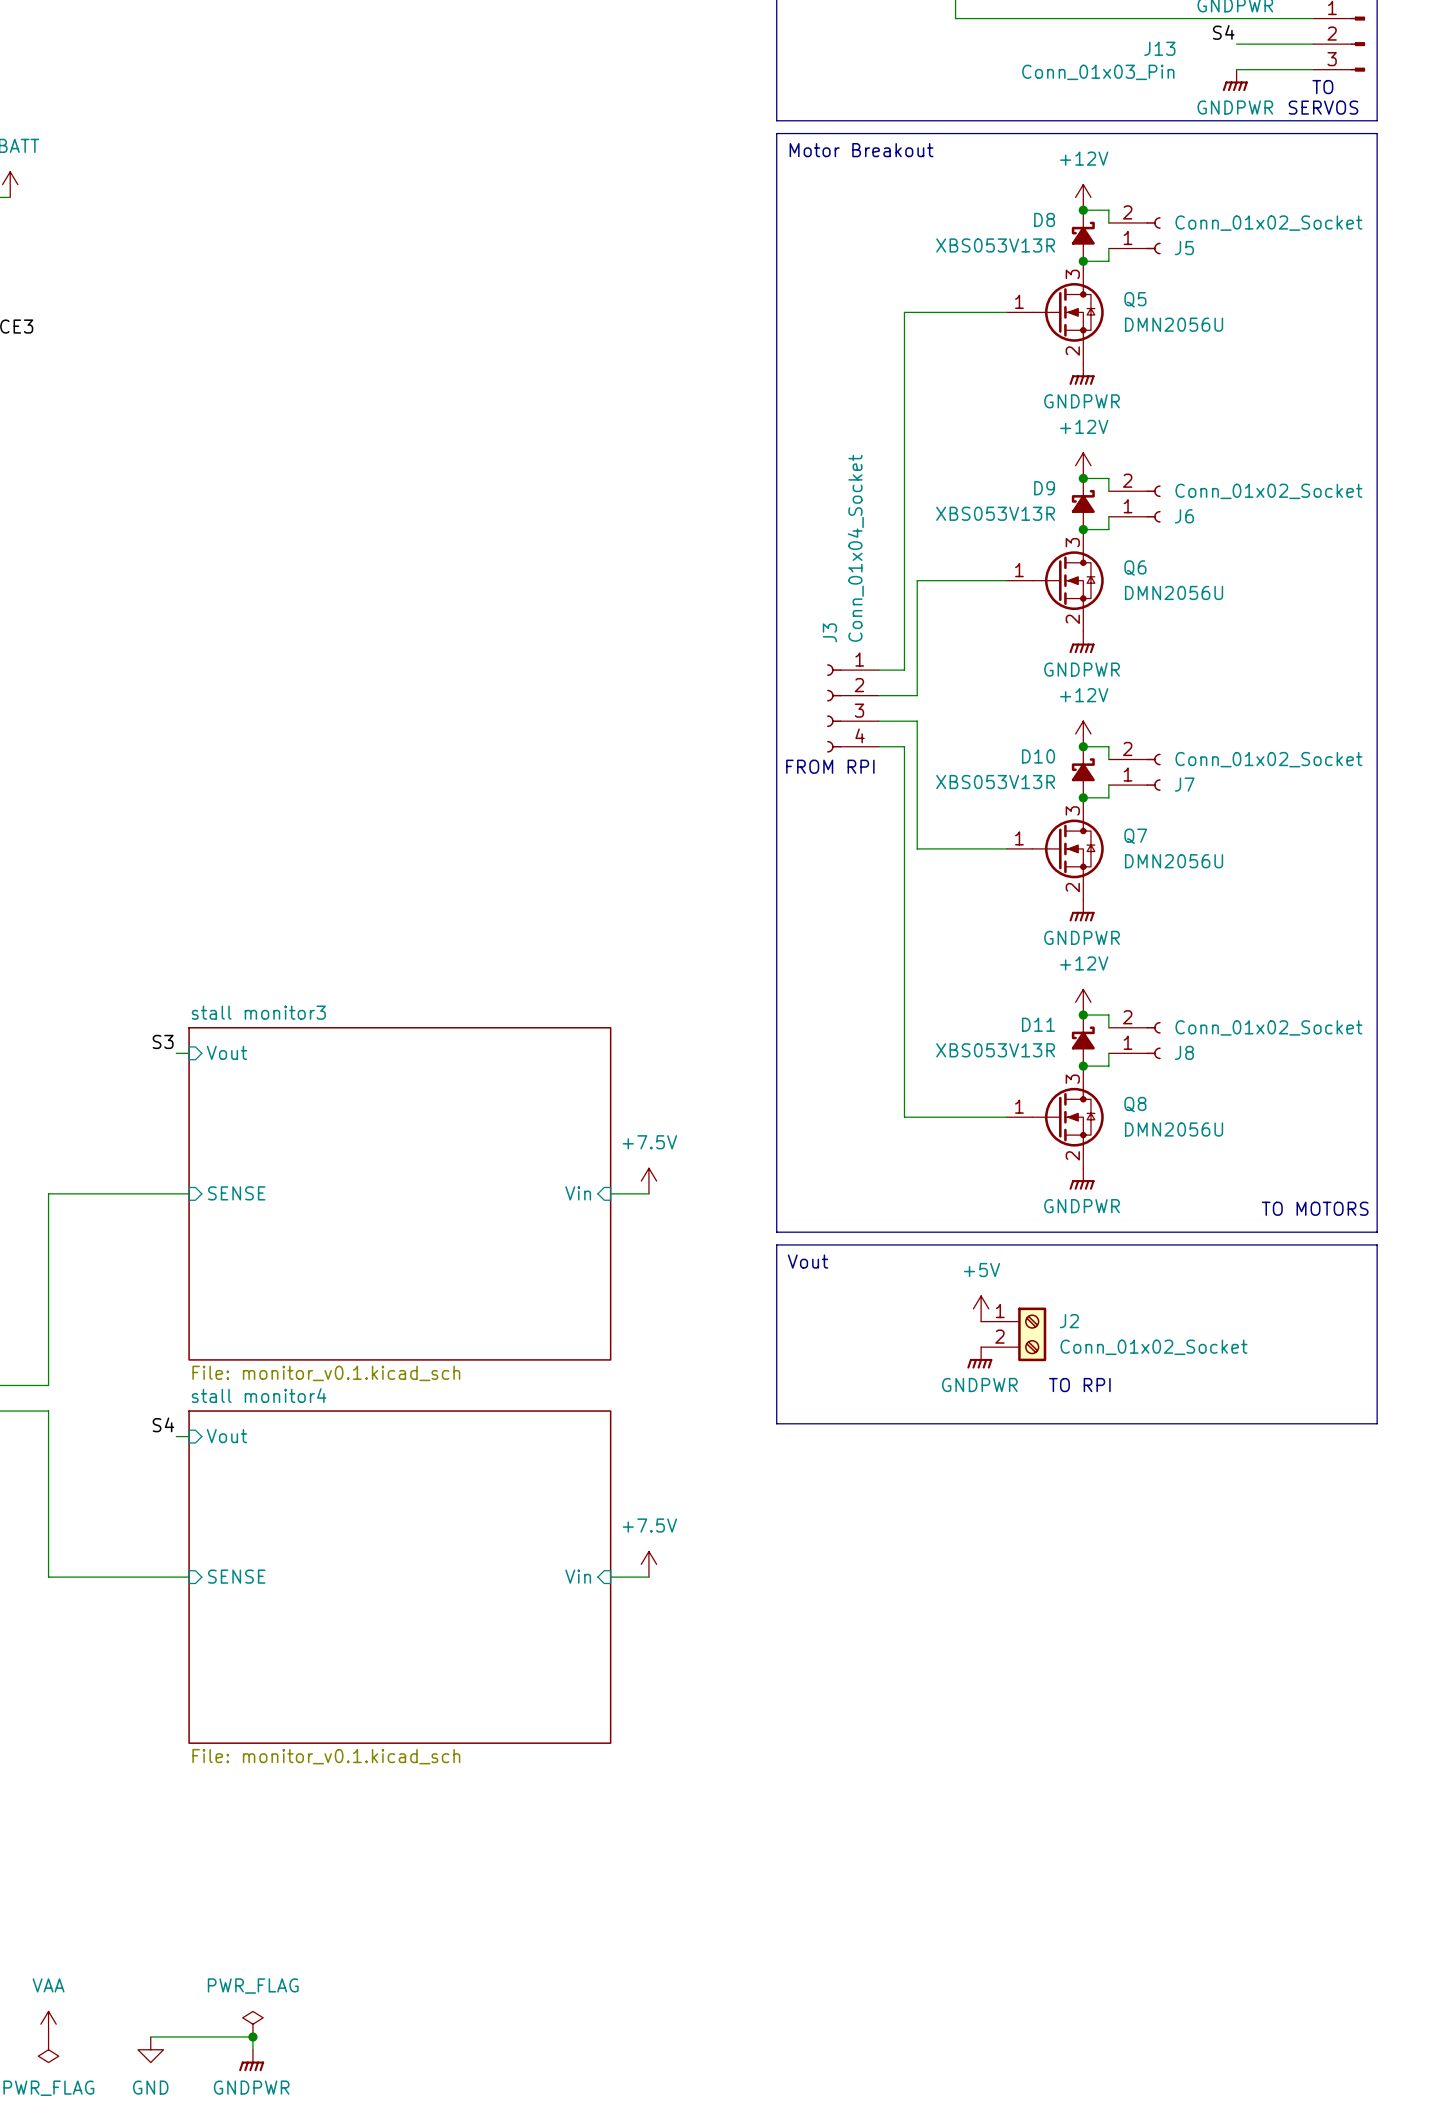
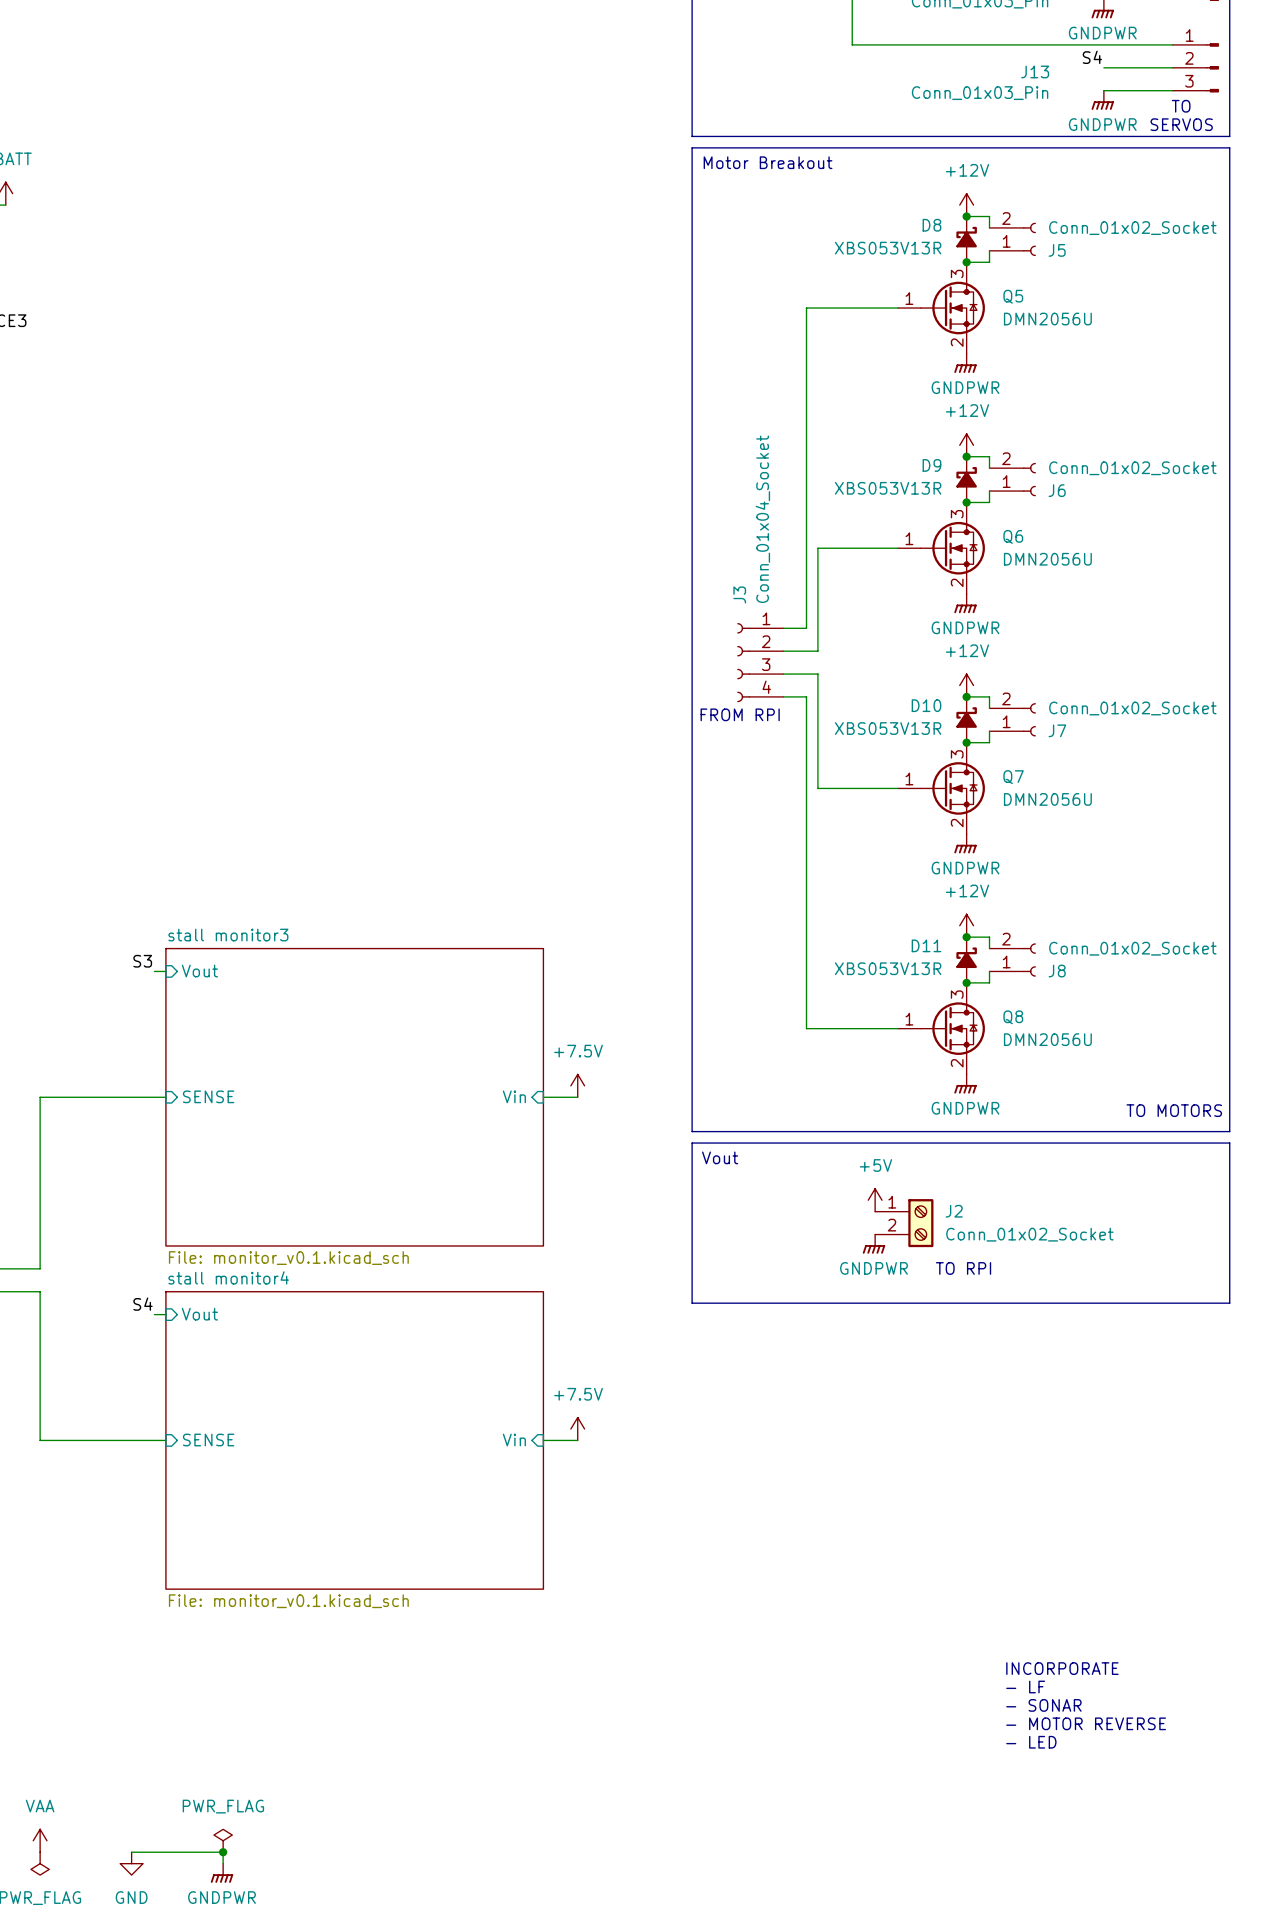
text: none -> INCORPORATE (1062, 1668)
text: none -> - LF (1025, 1687)
text: none -> - SONAR (1043, 1705)
text: none -> - MOTOR REVERSE (1086, 1723)
text: none -> - LED (1031, 1742)

